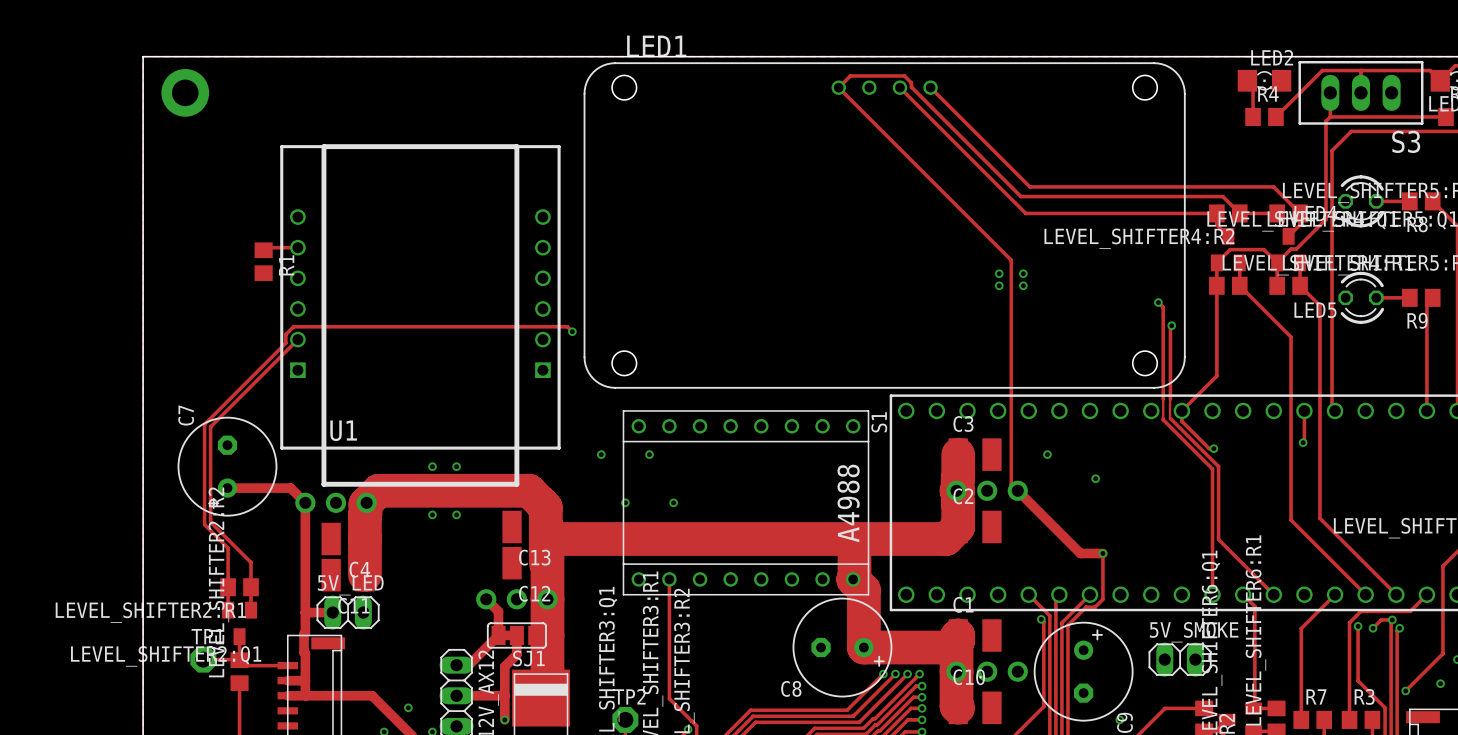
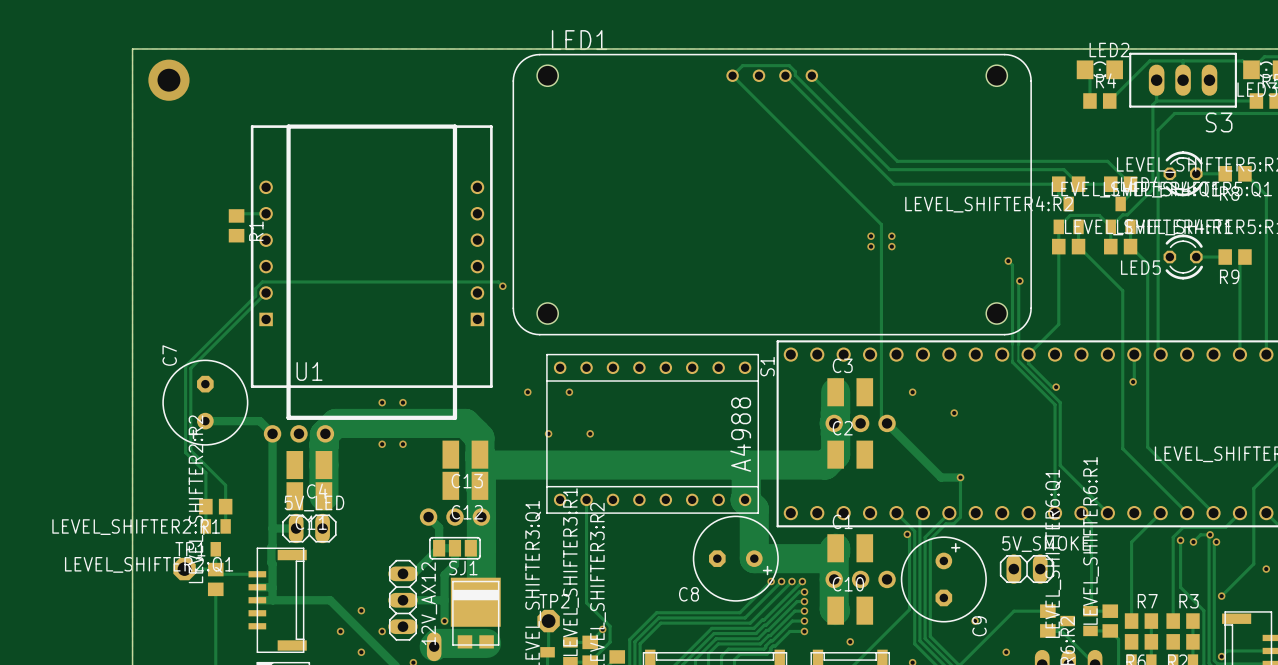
via: (1440, 683) -> none

